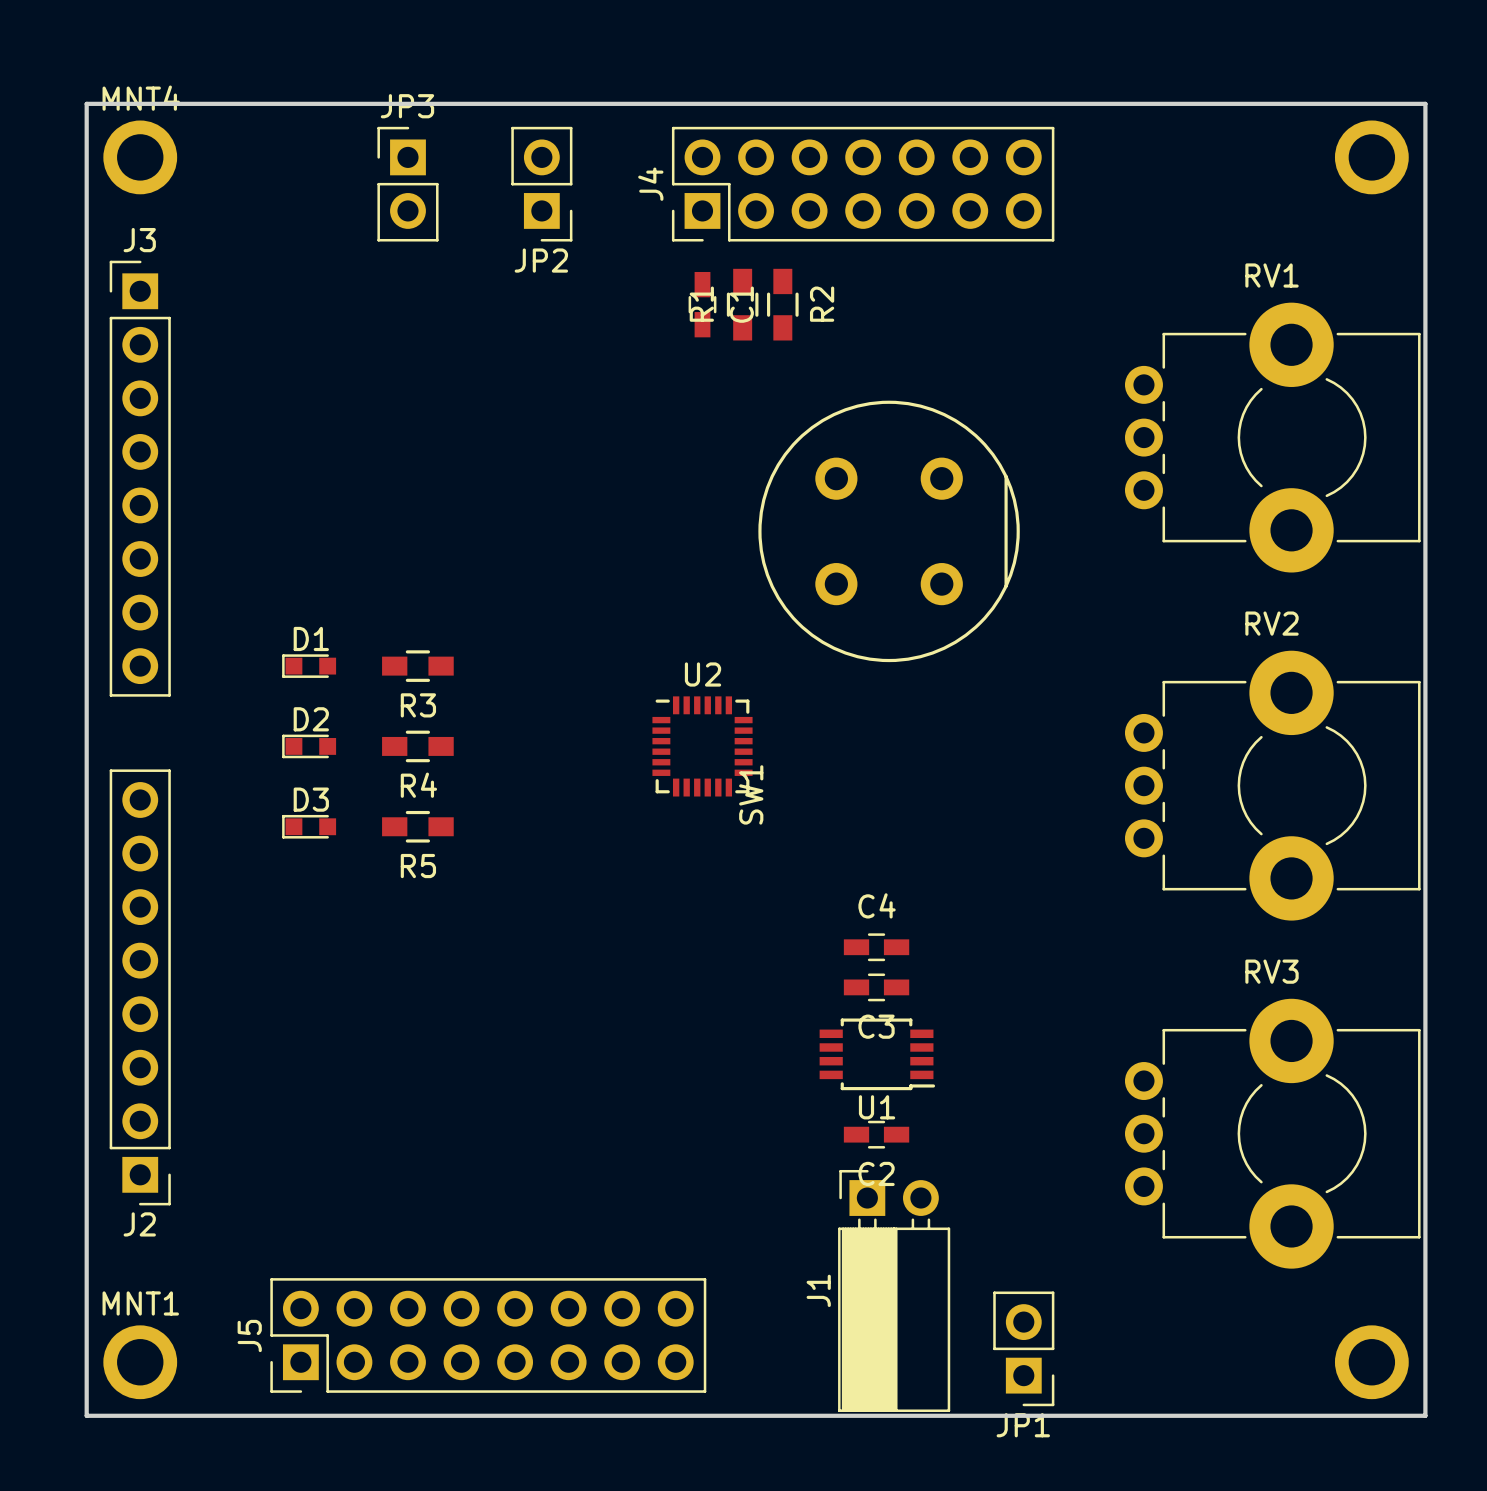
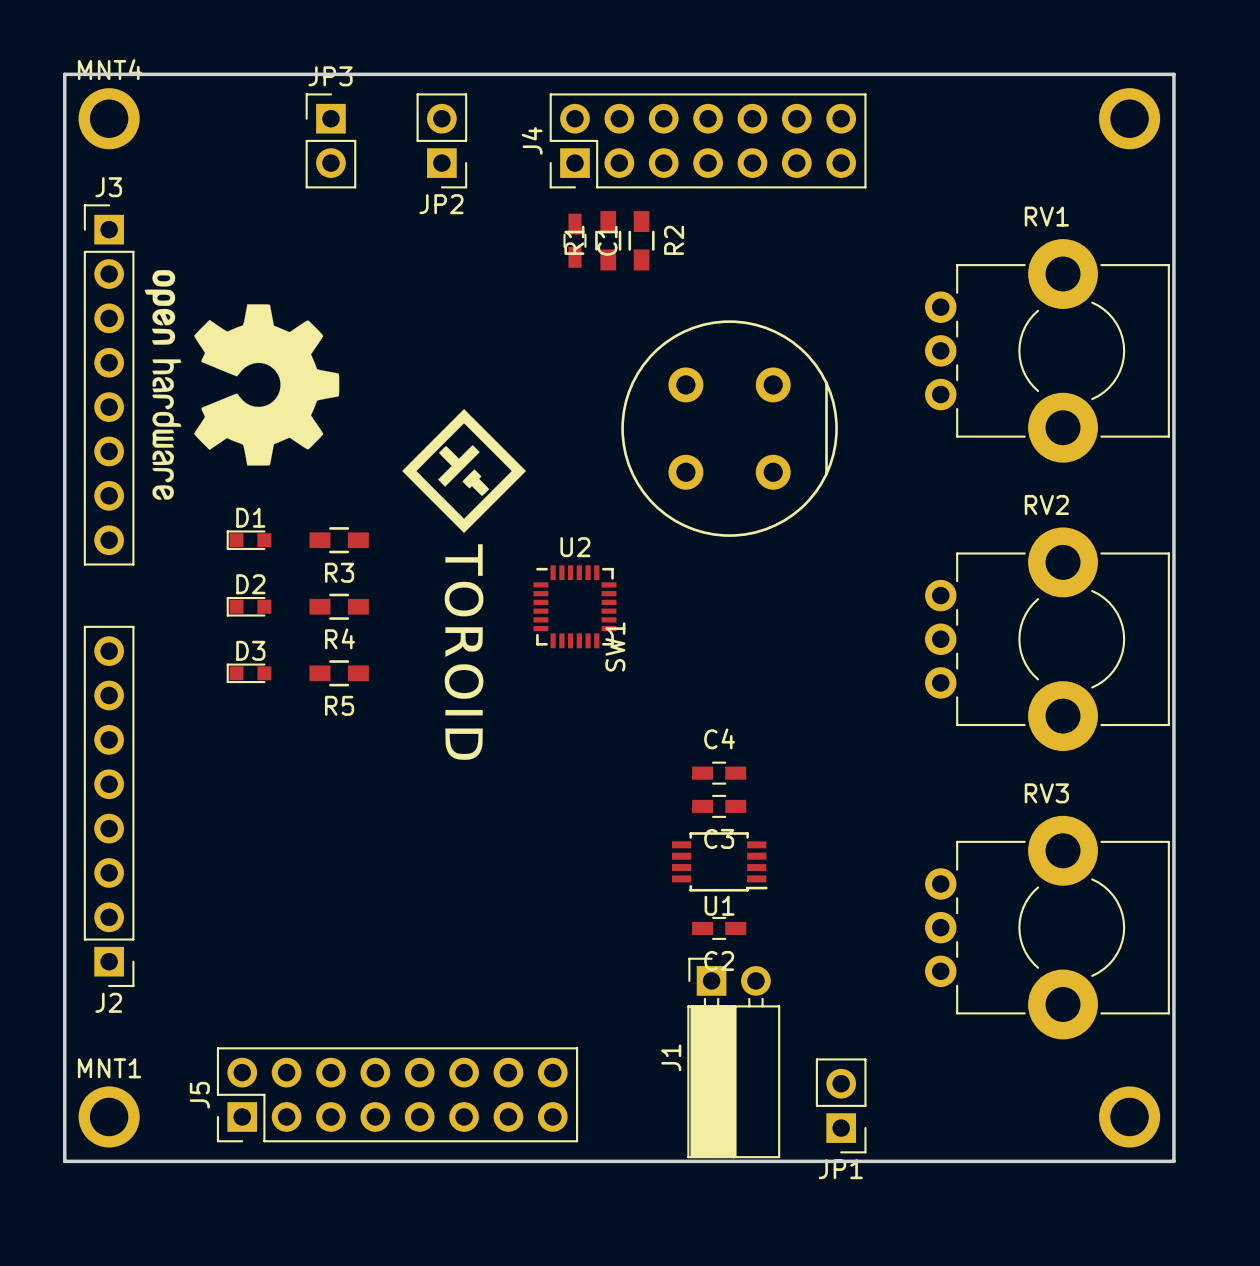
drawing: none -> [144, 270, 340, 500]
drawing: none -> [402, 409, 527, 760]

